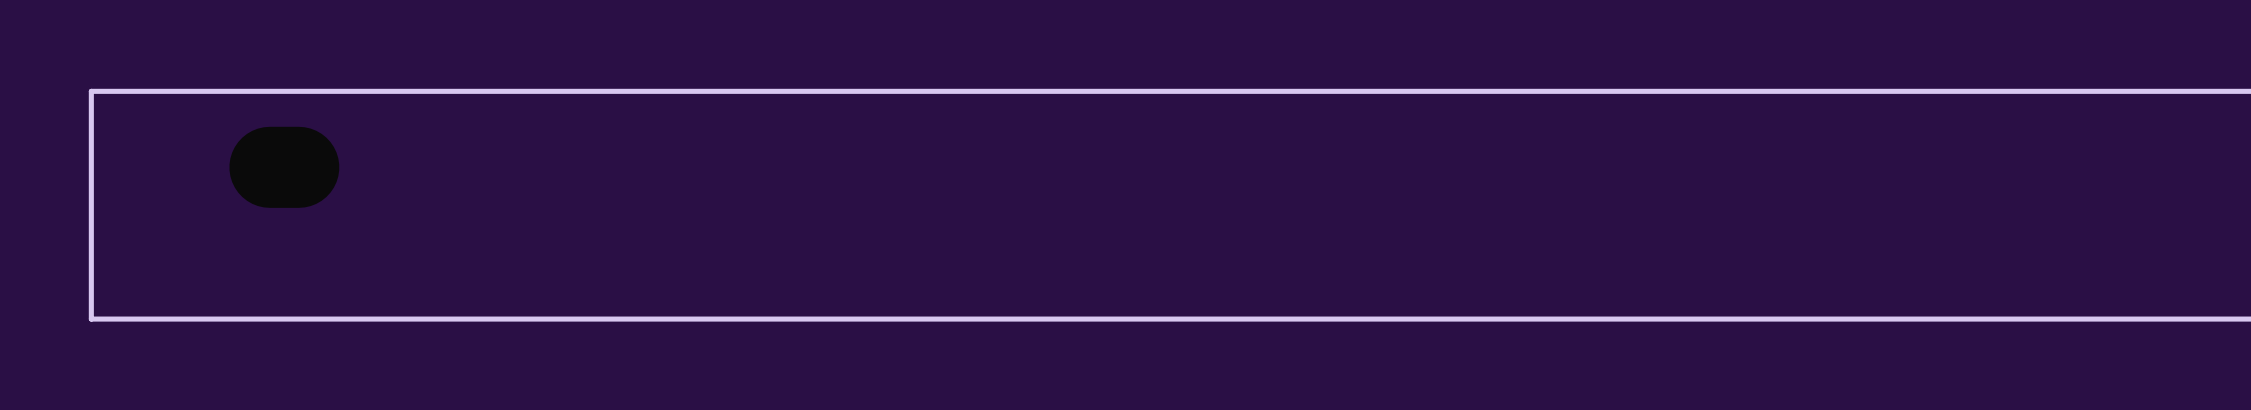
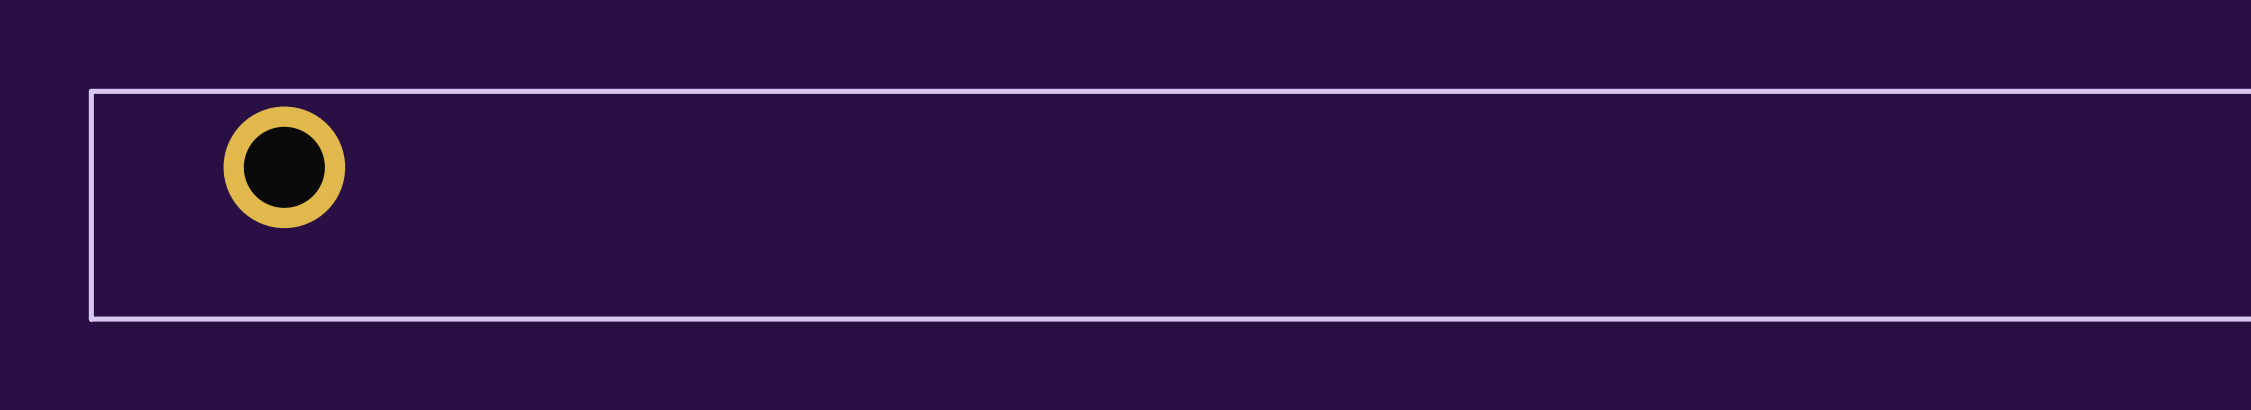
part footprint: [229, 126, 340, 208] -> [223, 106, 346, 229]

